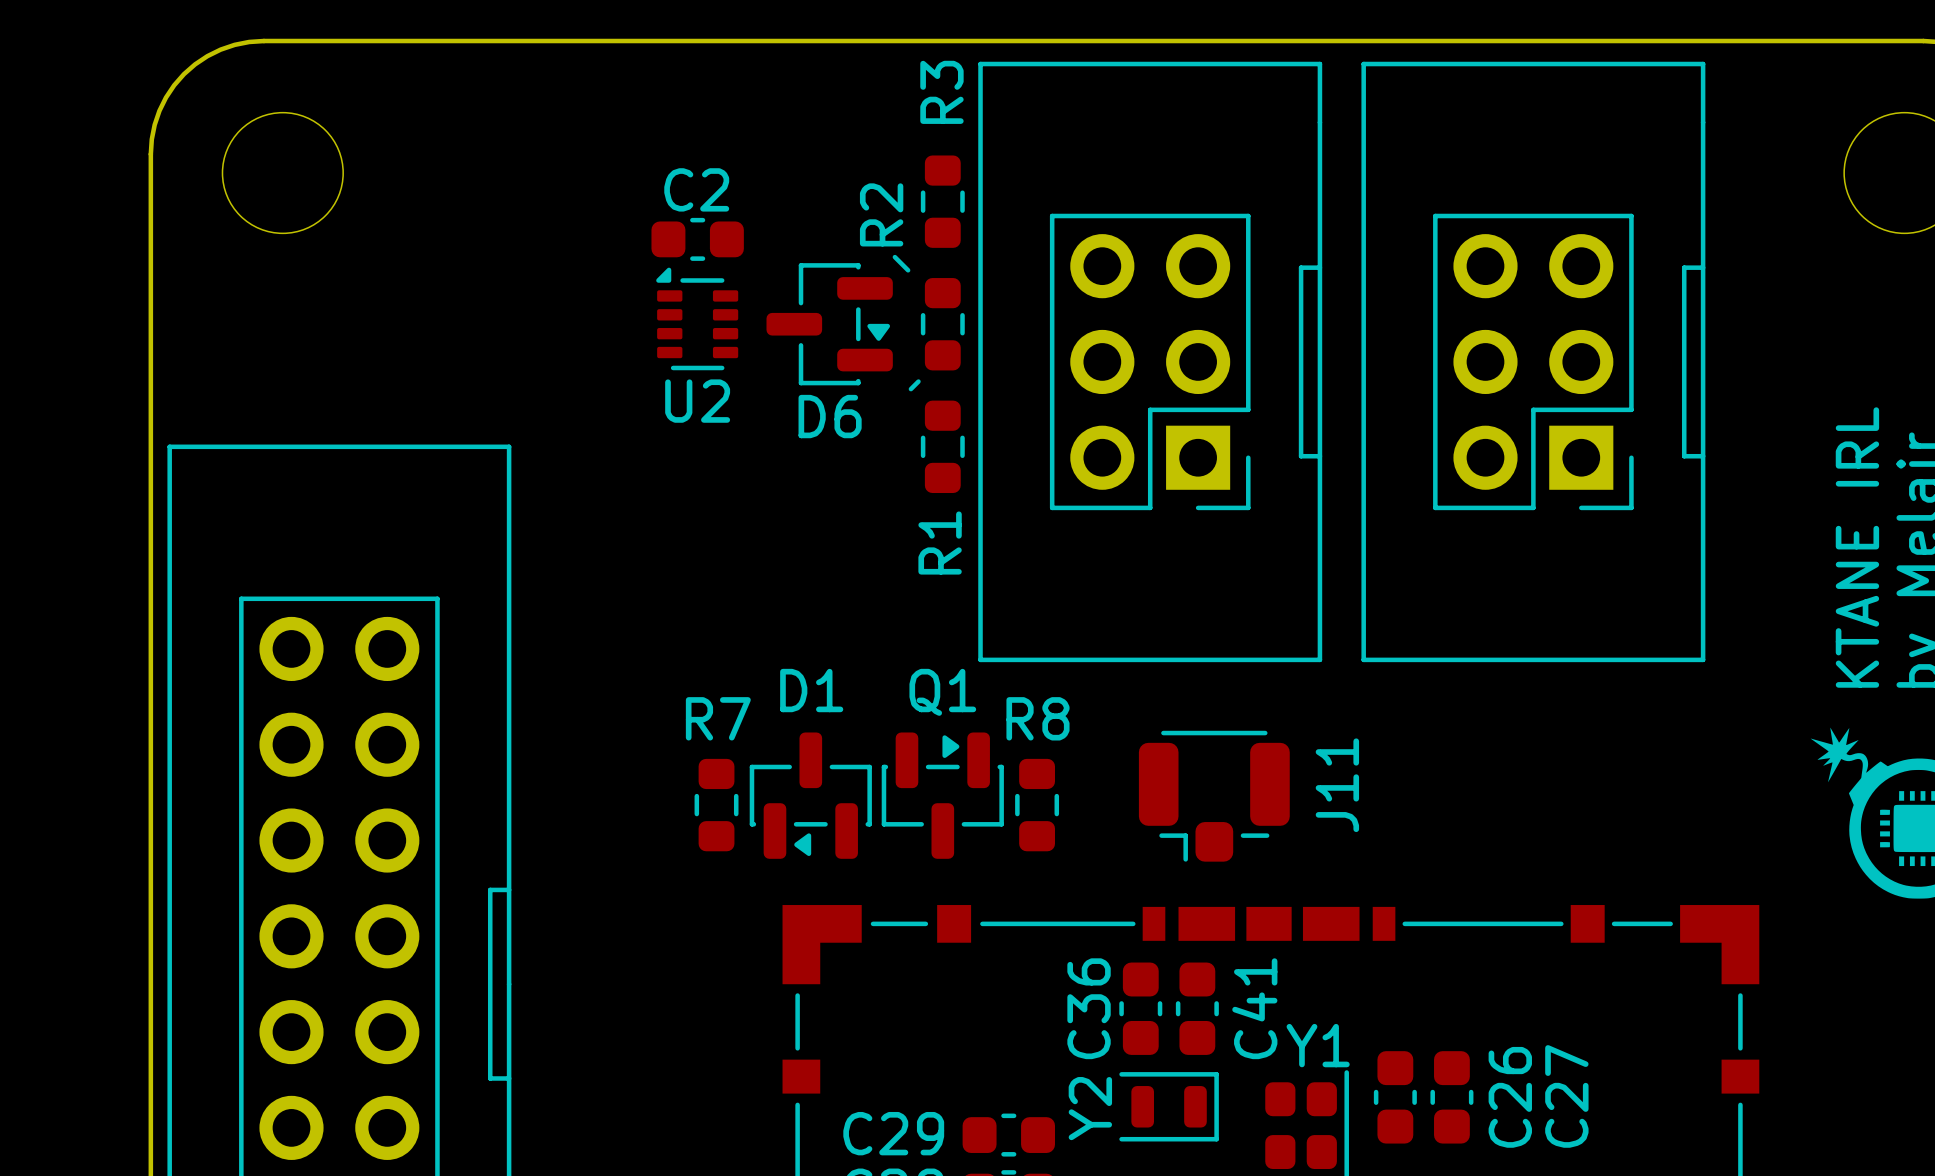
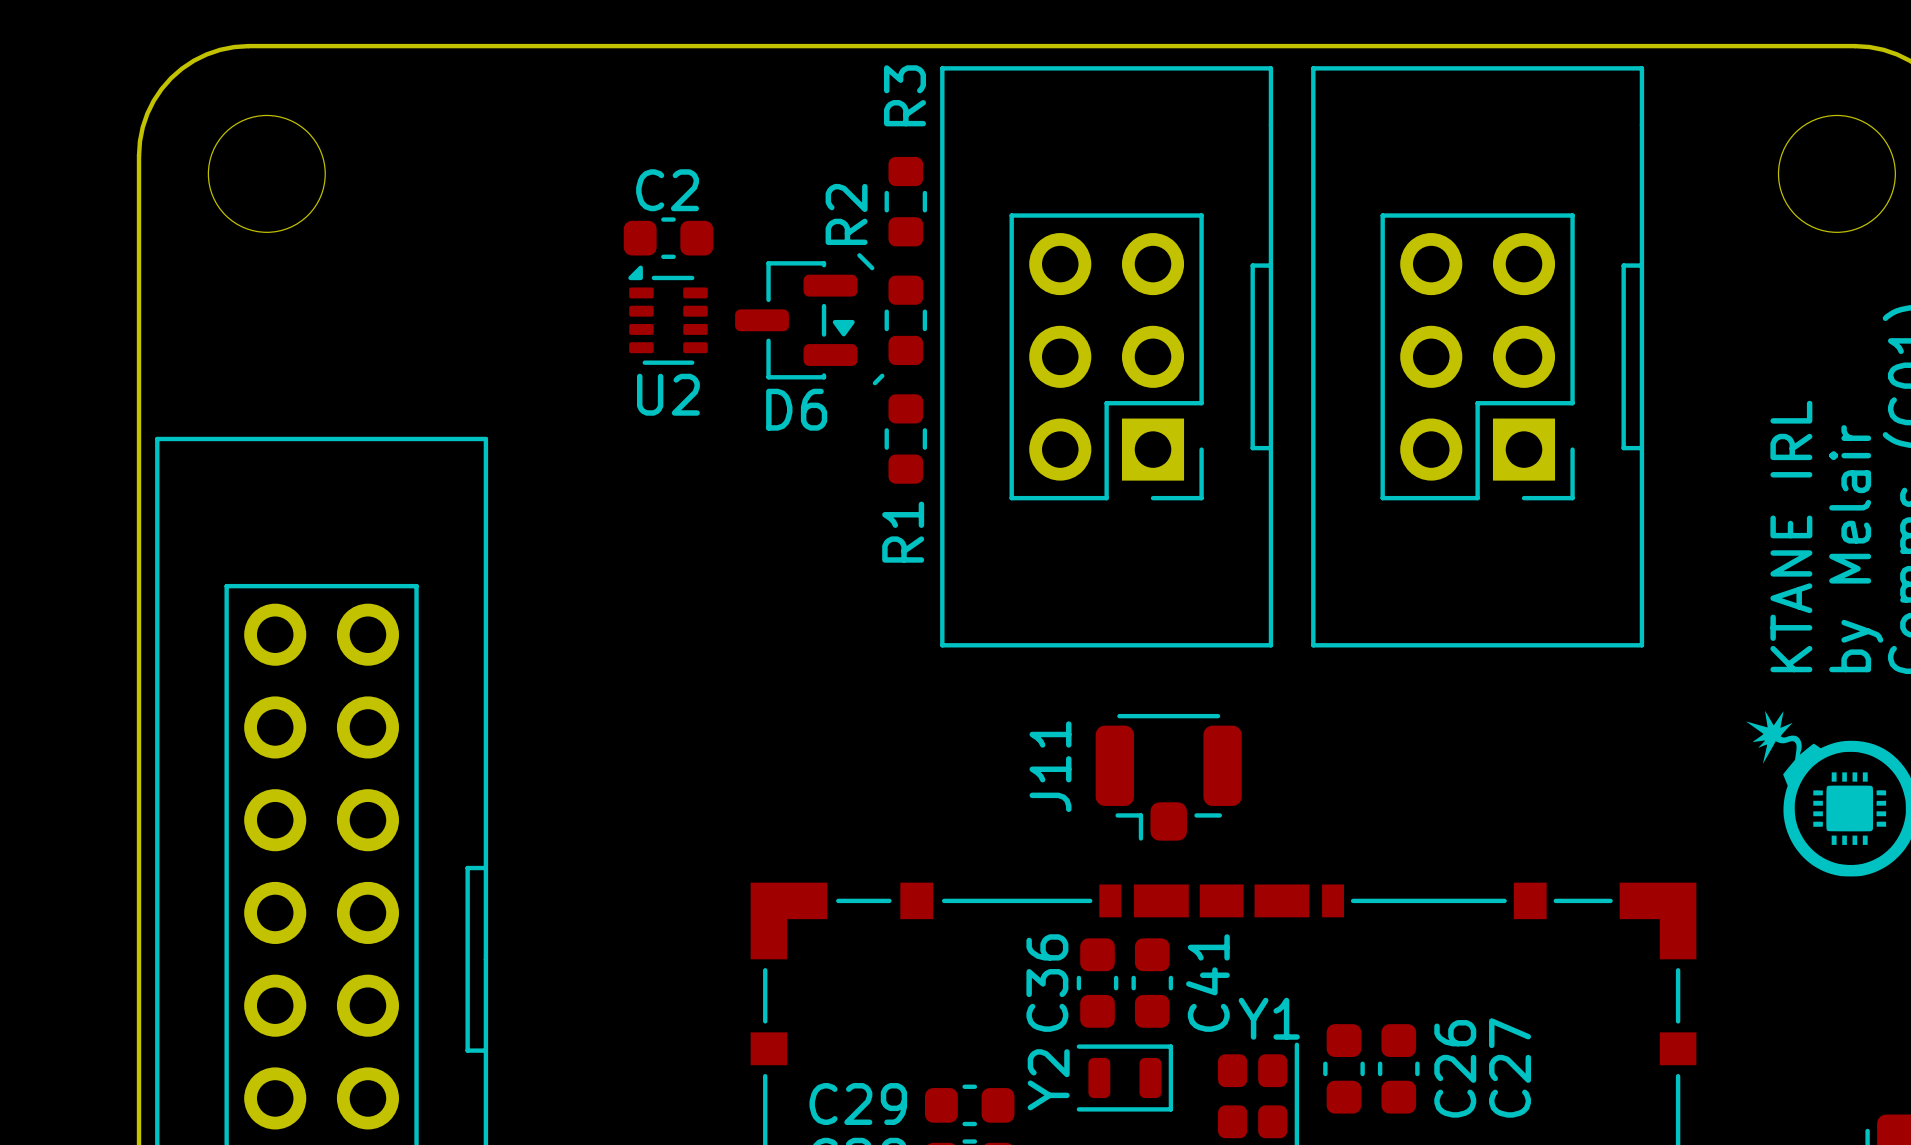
J11 name position: J11 (1337, 785) -> J11 (1050, 766)
D1: (810, 795) -> none
Q1: (942, 795) -> none
R7: (716, 805) -> none
R8: (1037, 805) -> none

